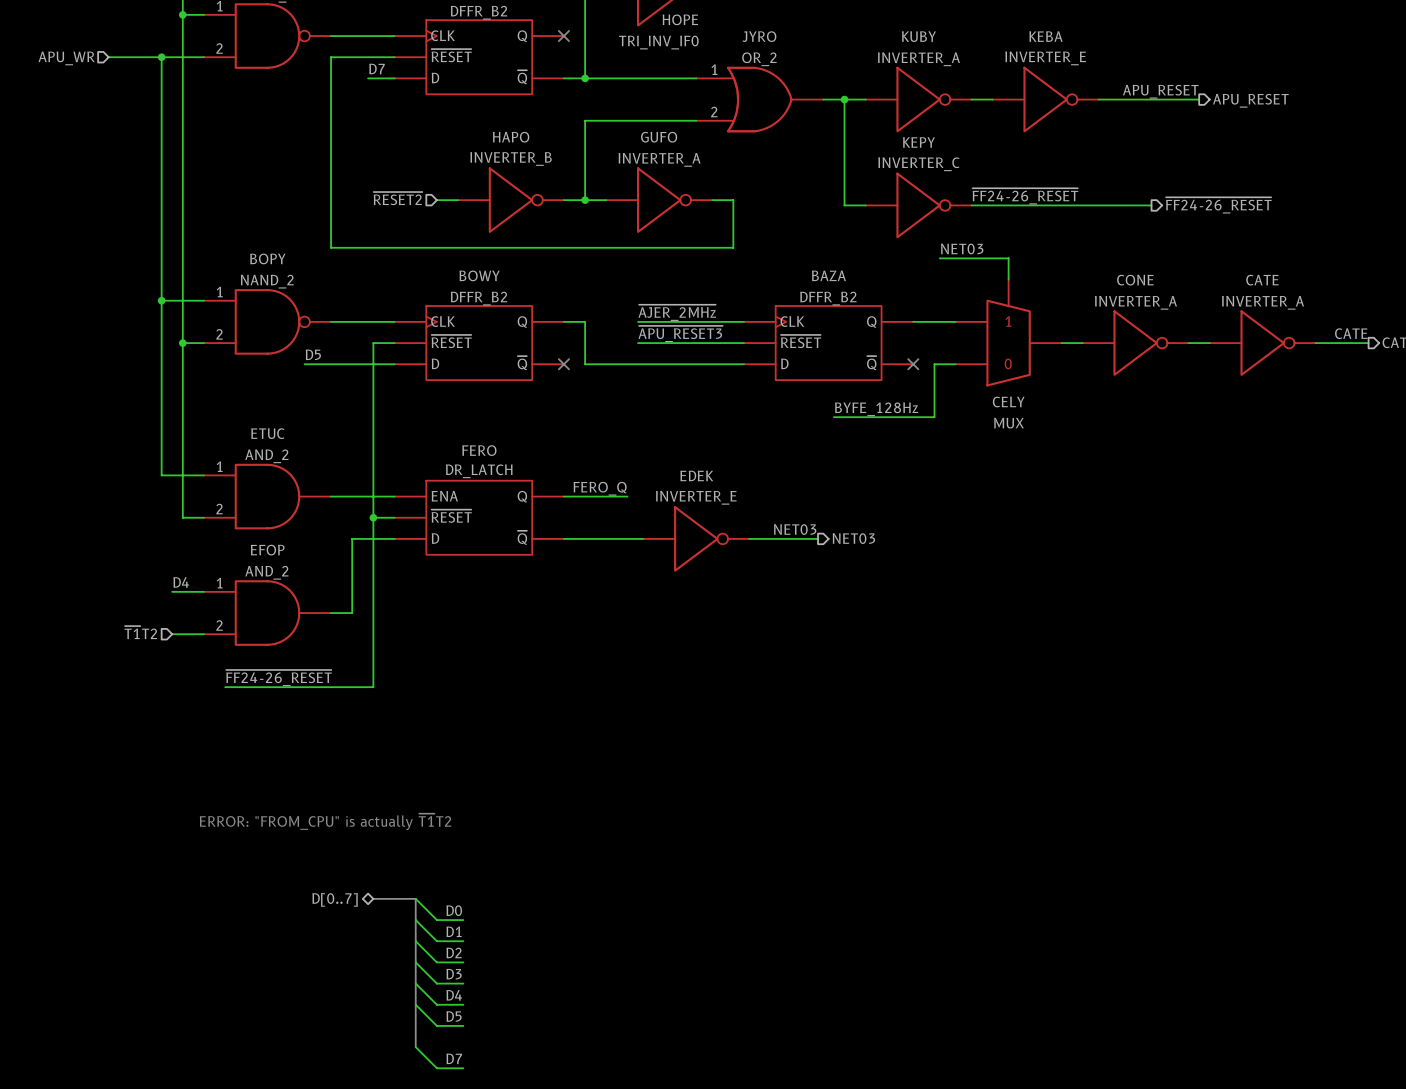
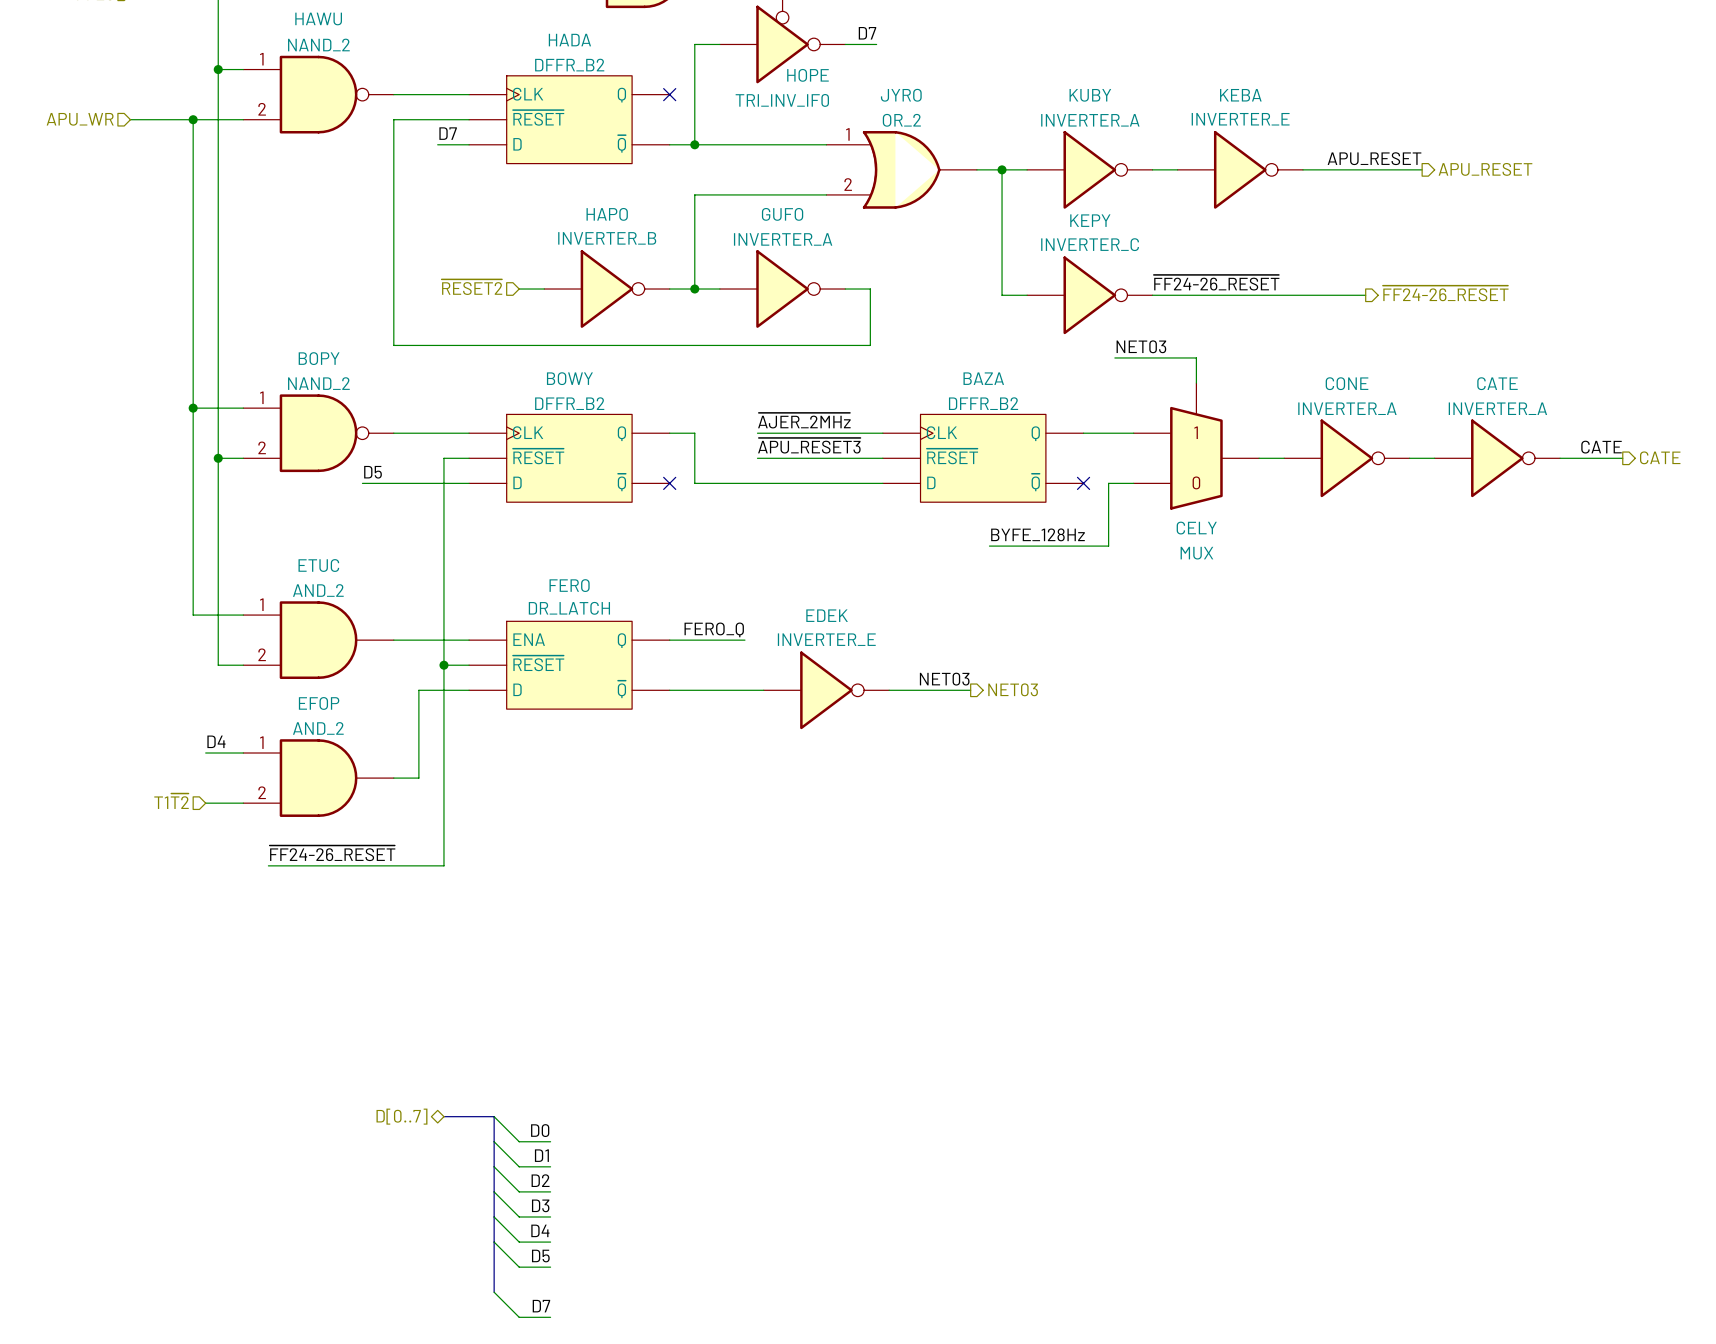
hierarchical label: ~{T1}T2 (140, 632) -> T1~{T2} (171, 801)
text: ERROR: "FROM_CPU" is actually ~{T1}T2 (325, 821) -> none

